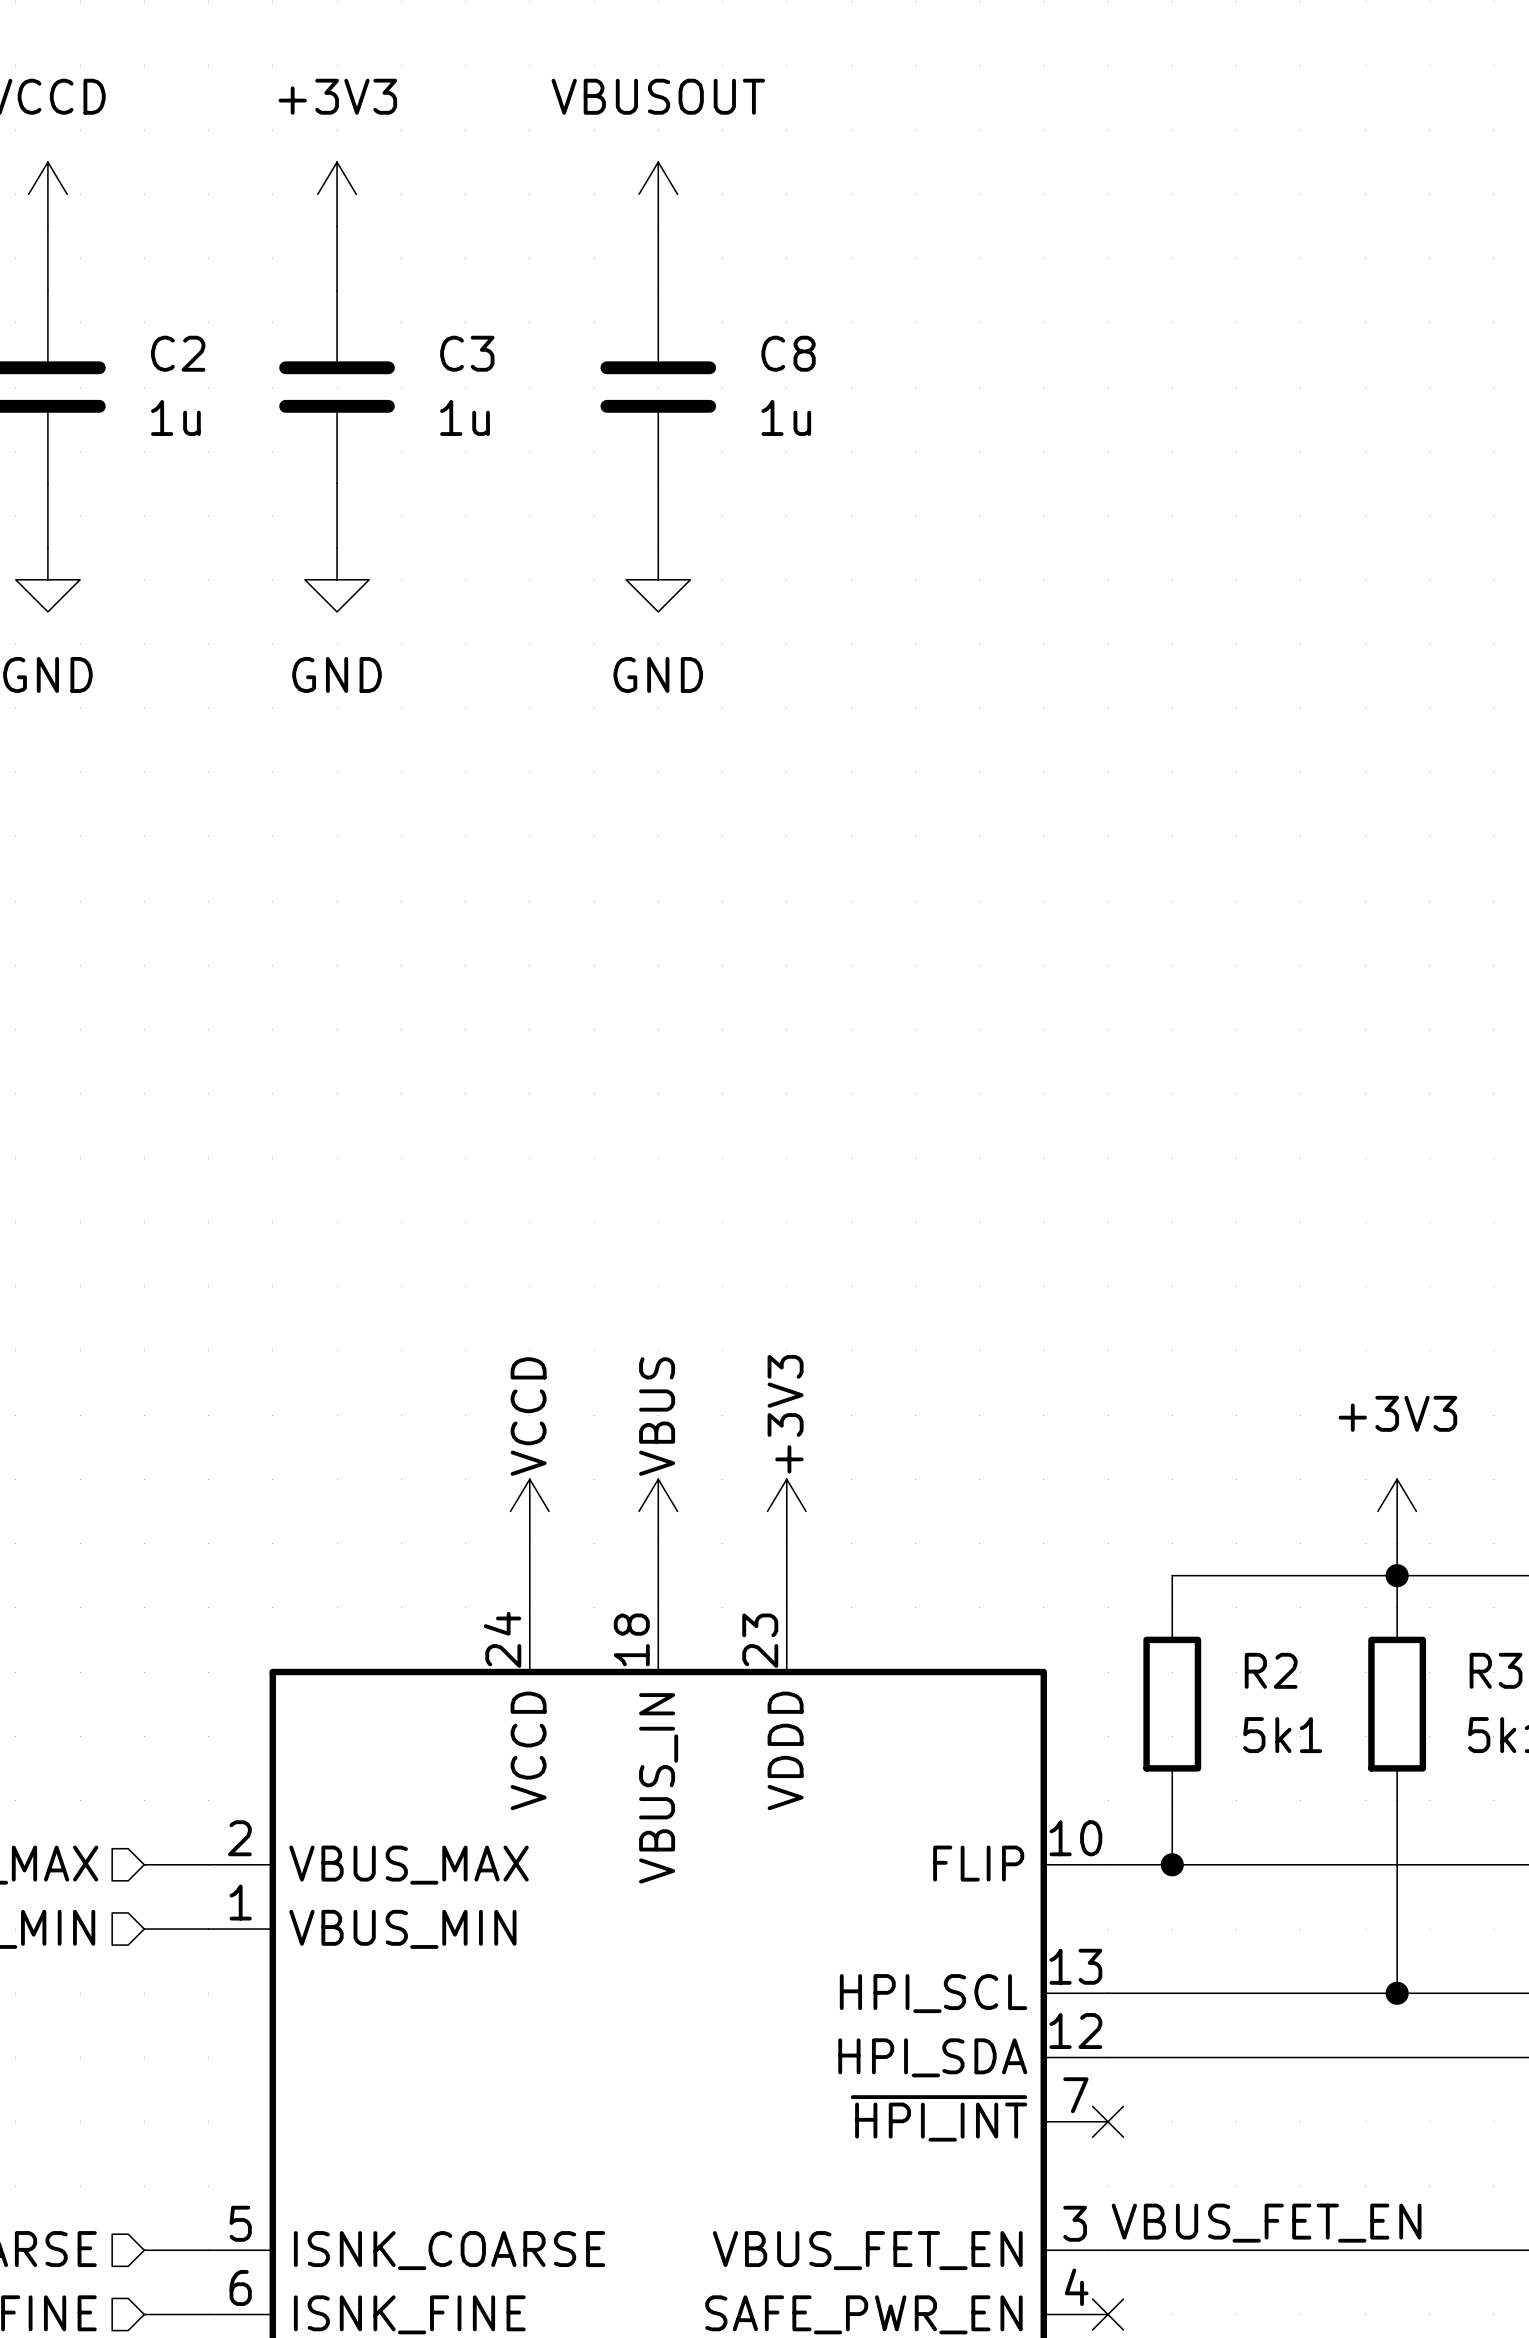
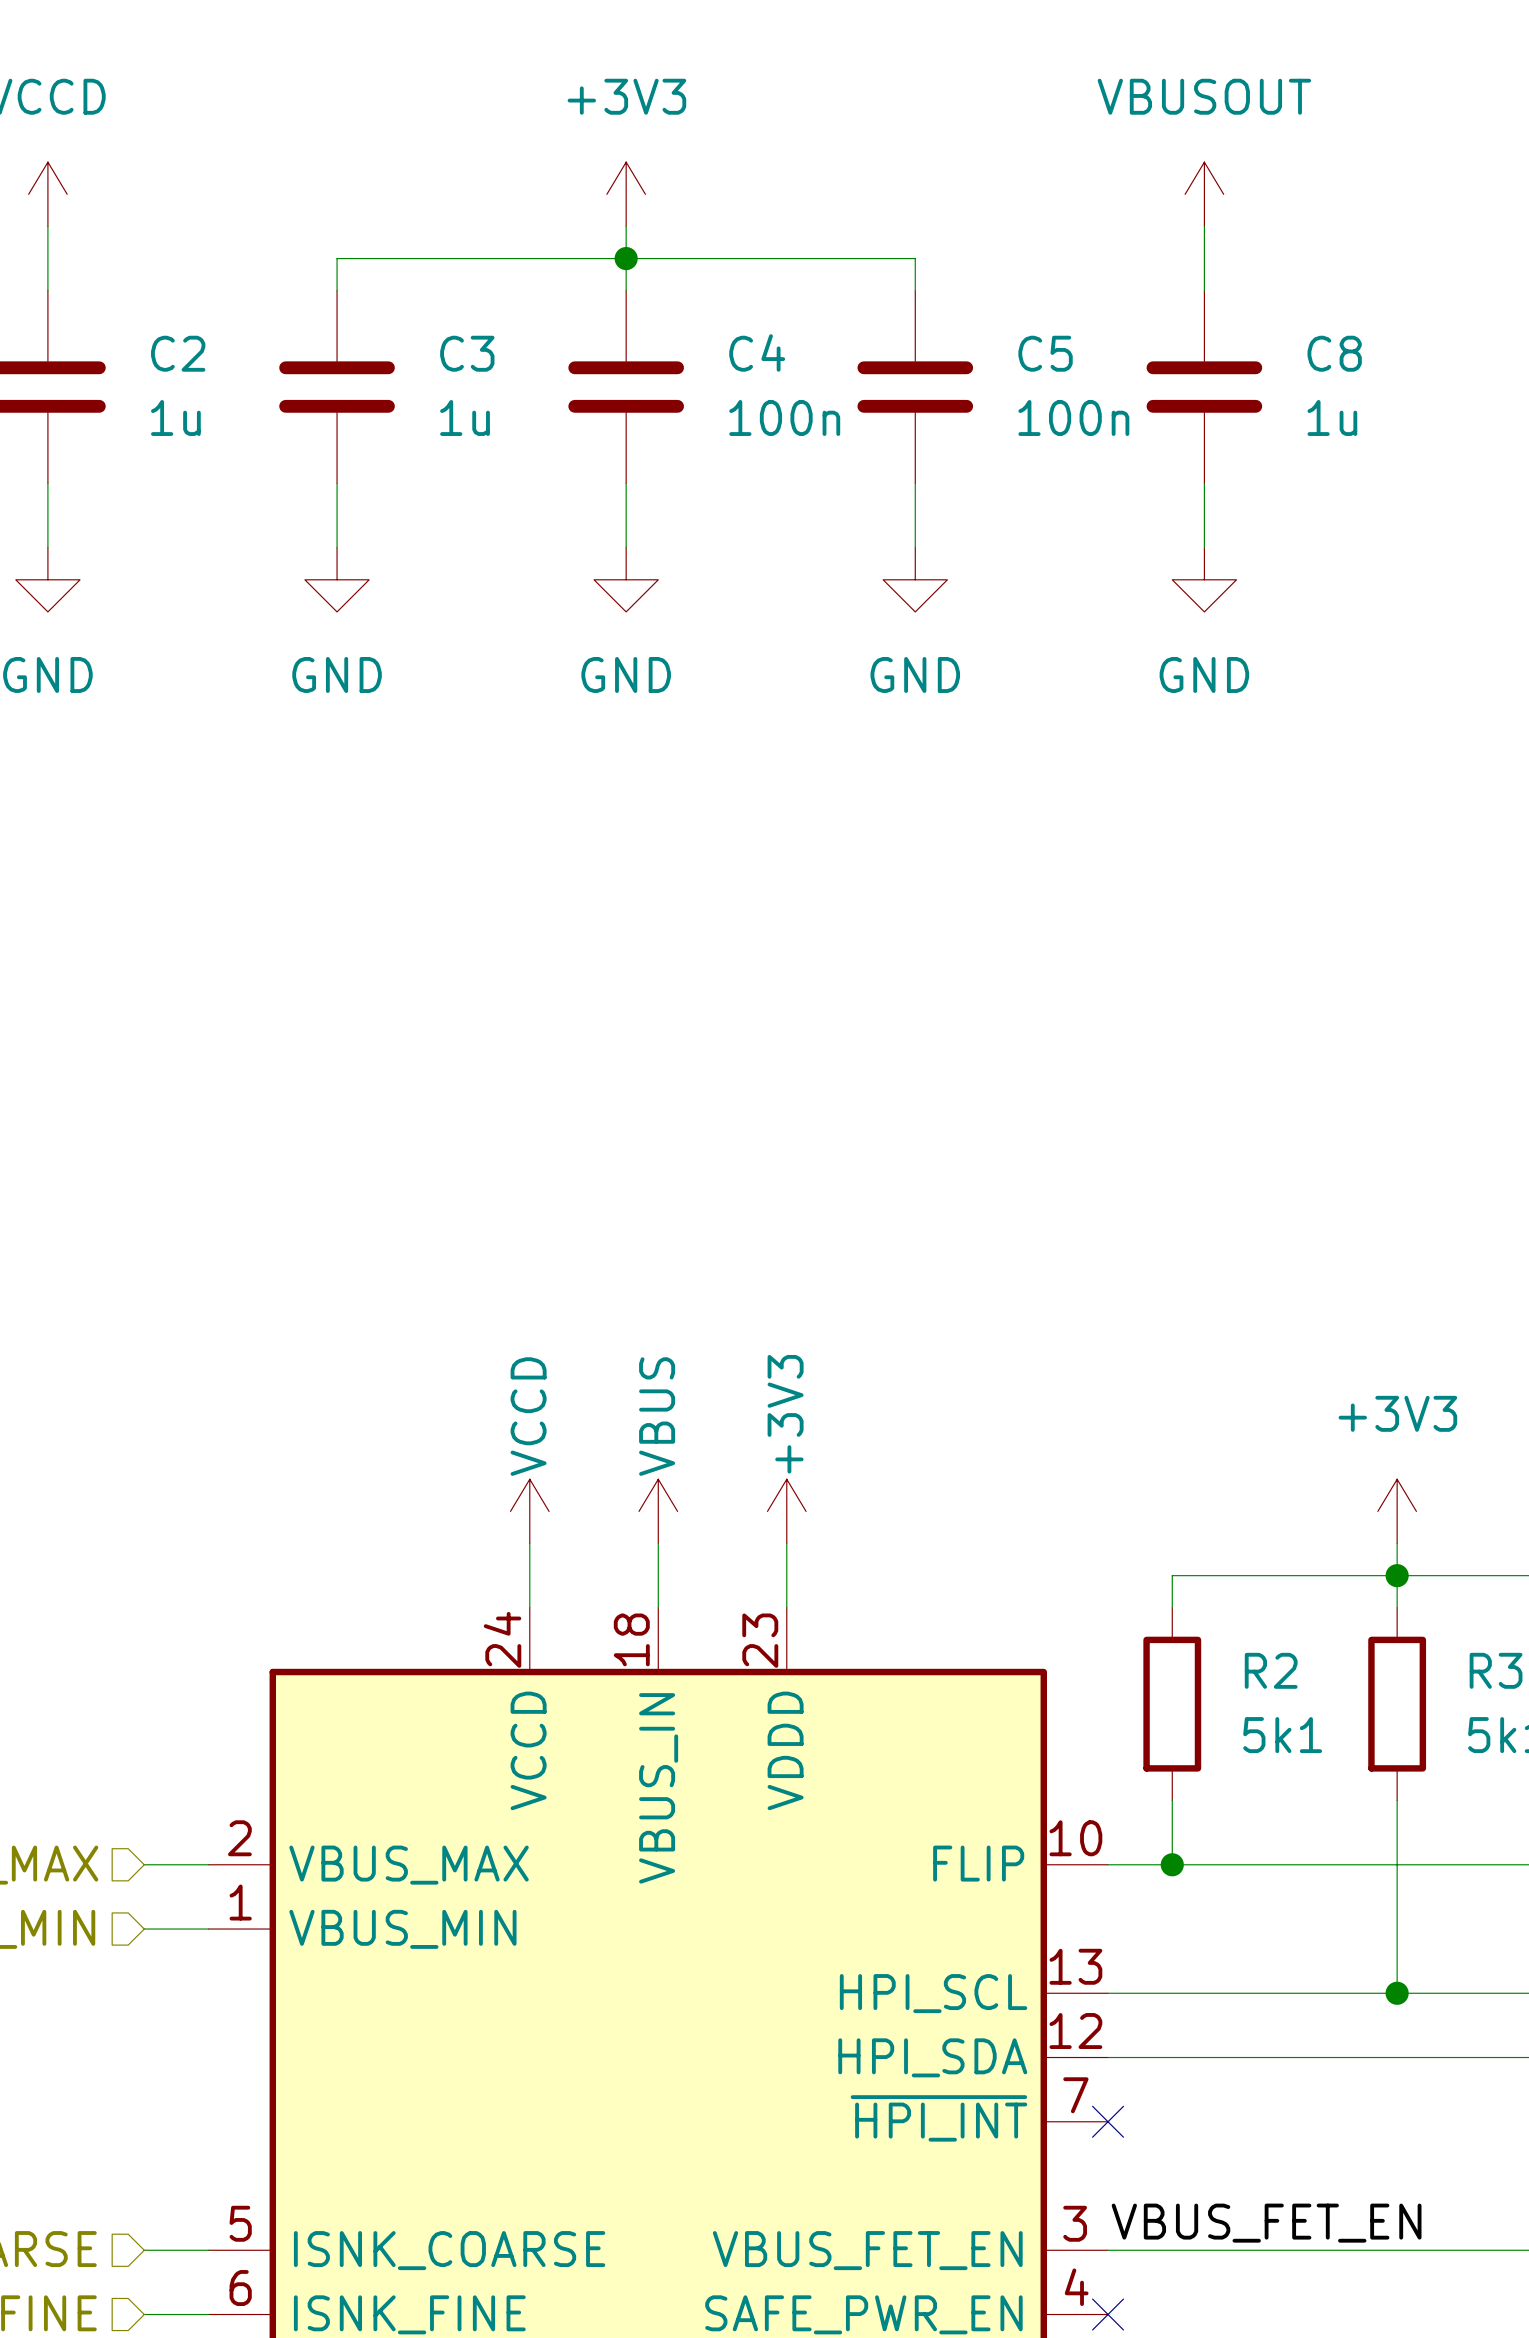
power symbol position: +3V3 (337, 194) -> +3V3 (626, 194)
power symbol position: VBUSOUT (658, 194) -> VBUSOUT (1204, 194)
wire: (337, 226) (337, 258) -> (915, 290) (915, 258) (337, 258)
wire: (658, 226) (658, 290) -> (626, 226) (626, 290)
wire: none -> (1204, 226) (1204, 290)
junction: none -> (626, 258)
C4: none -> 100n (626, 387)
C8 position: (658, 387) -> (1204, 387)
C5: none -> 100n (915, 387)
wire: (658, 483) (658, 547) -> (626, 483) (626, 547)
wire: none -> (915, 483) (915, 547)
wire: none -> (1204, 483) (1204, 547)
power symbol position: GND (658, 579) -> GND (626, 579)
power symbol: none -> GND (915, 579)
power symbol: none -> GND (1204, 579)

